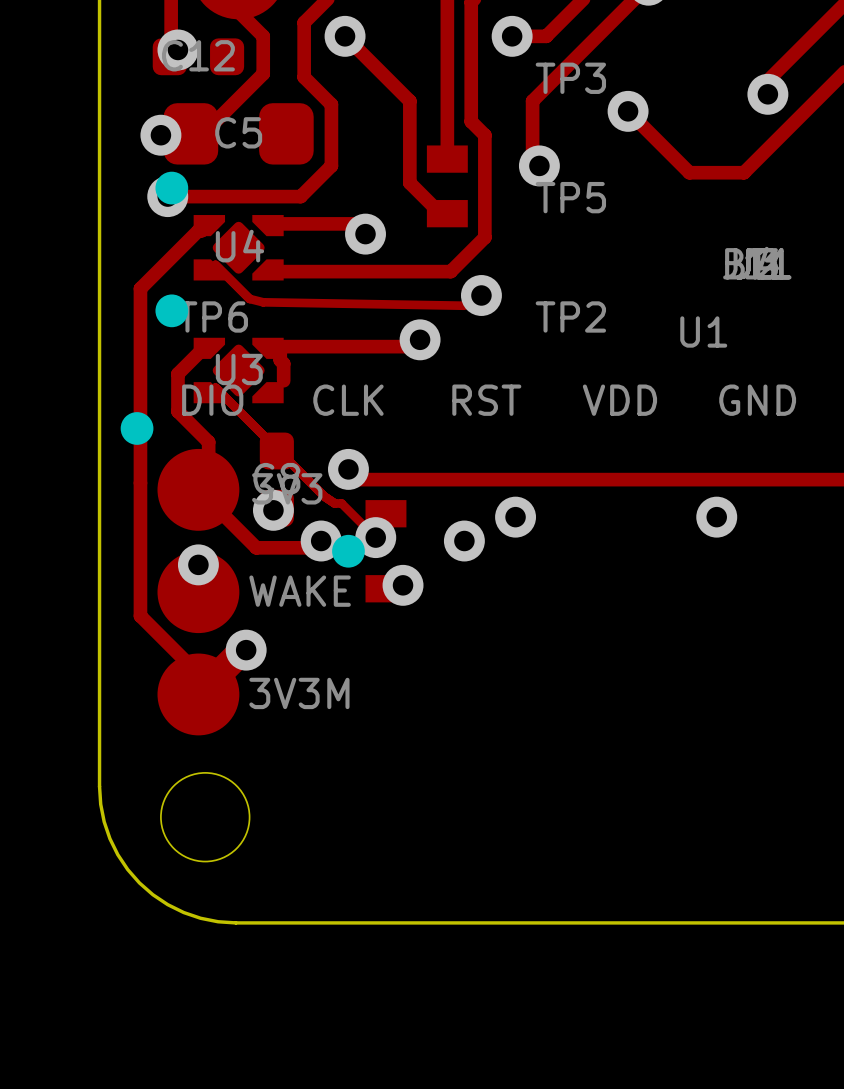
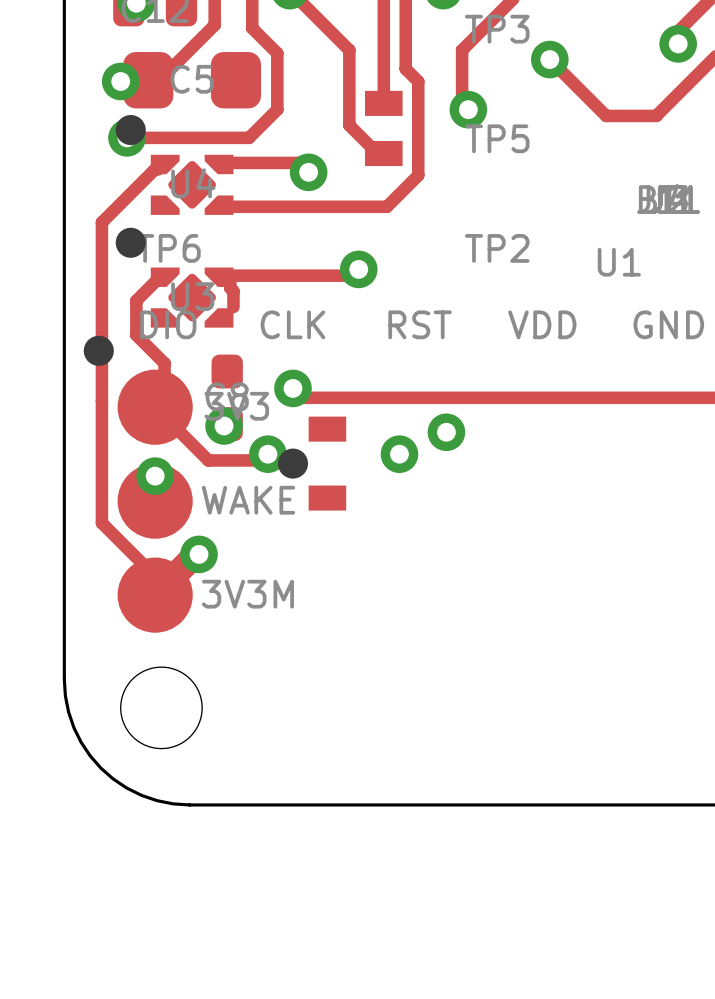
track: (215, 264) (249, 298) (263, 302) (464, 305) -> none
via: (481, 295) -> none
track: (215, 387) (324, 496) (334, 503) (341, 503) (375, 537) -> none
via: (716, 517) -> none
via: (375, 537) -> none
via: (403, 585) -> none

